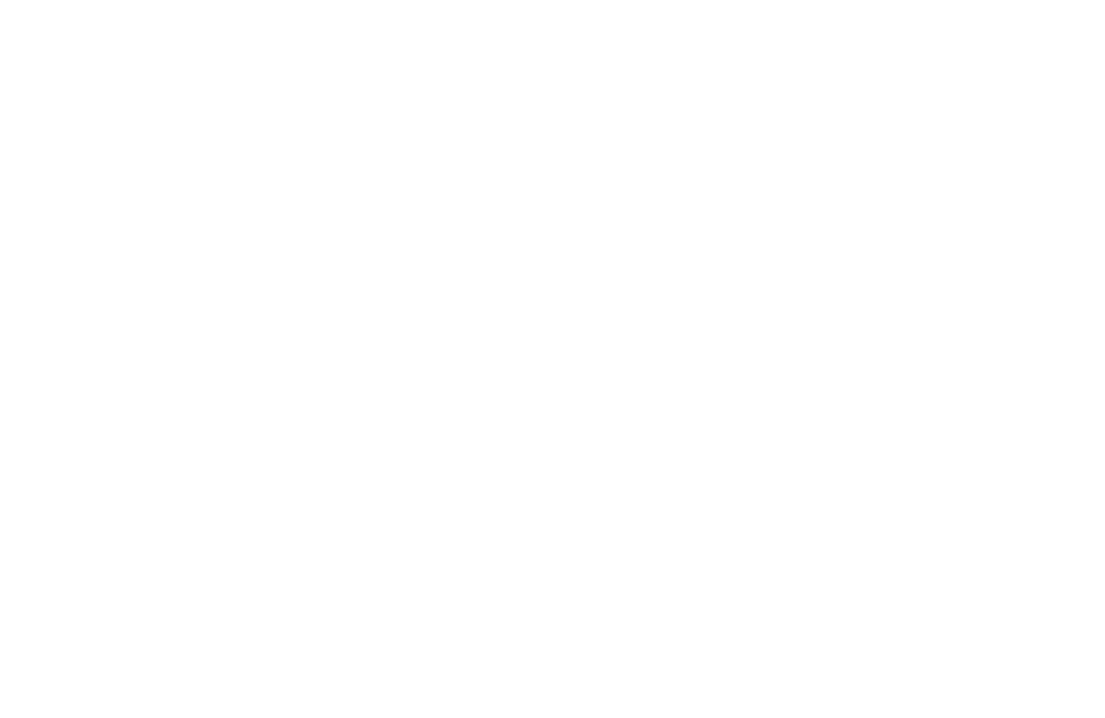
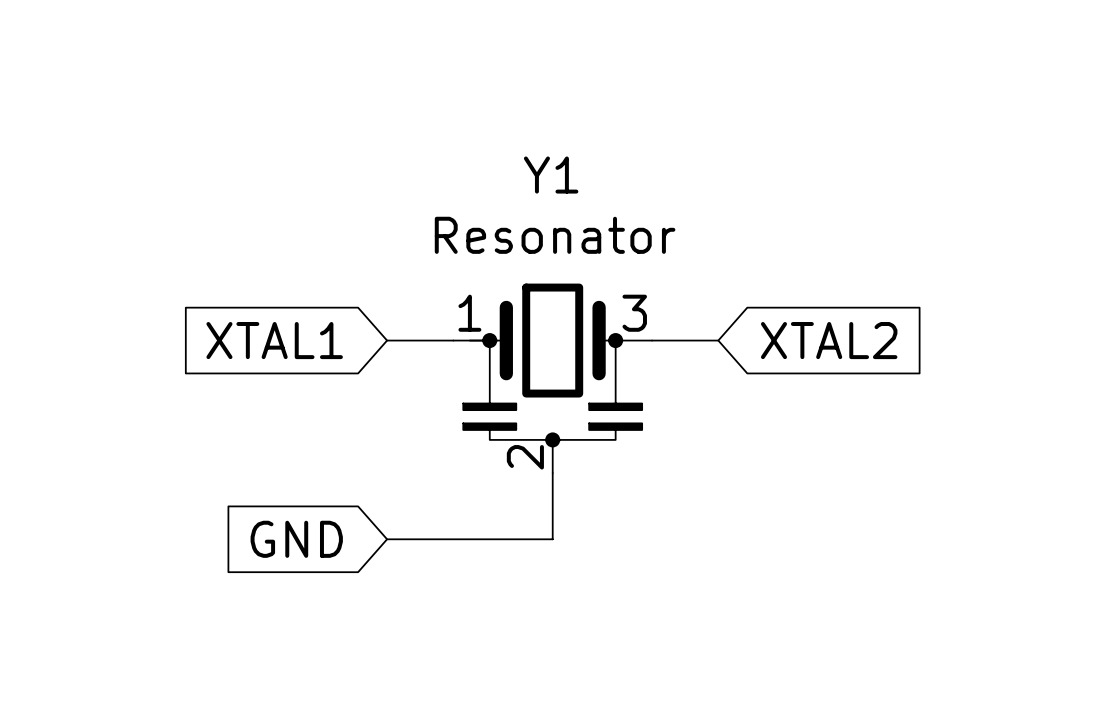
global label: none -> XTAL1 (274, 340)
wire: none -> (387, 340) (453, 340)
wire: none -> (652, 340) (718, 340)
global label: none -> XTAL2 (829, 340)
Y1: none -> Resonator (552, 378)
wire: none -> (552, 473) (552, 539) (387, 539)
global label: none -> GND (296, 539)

